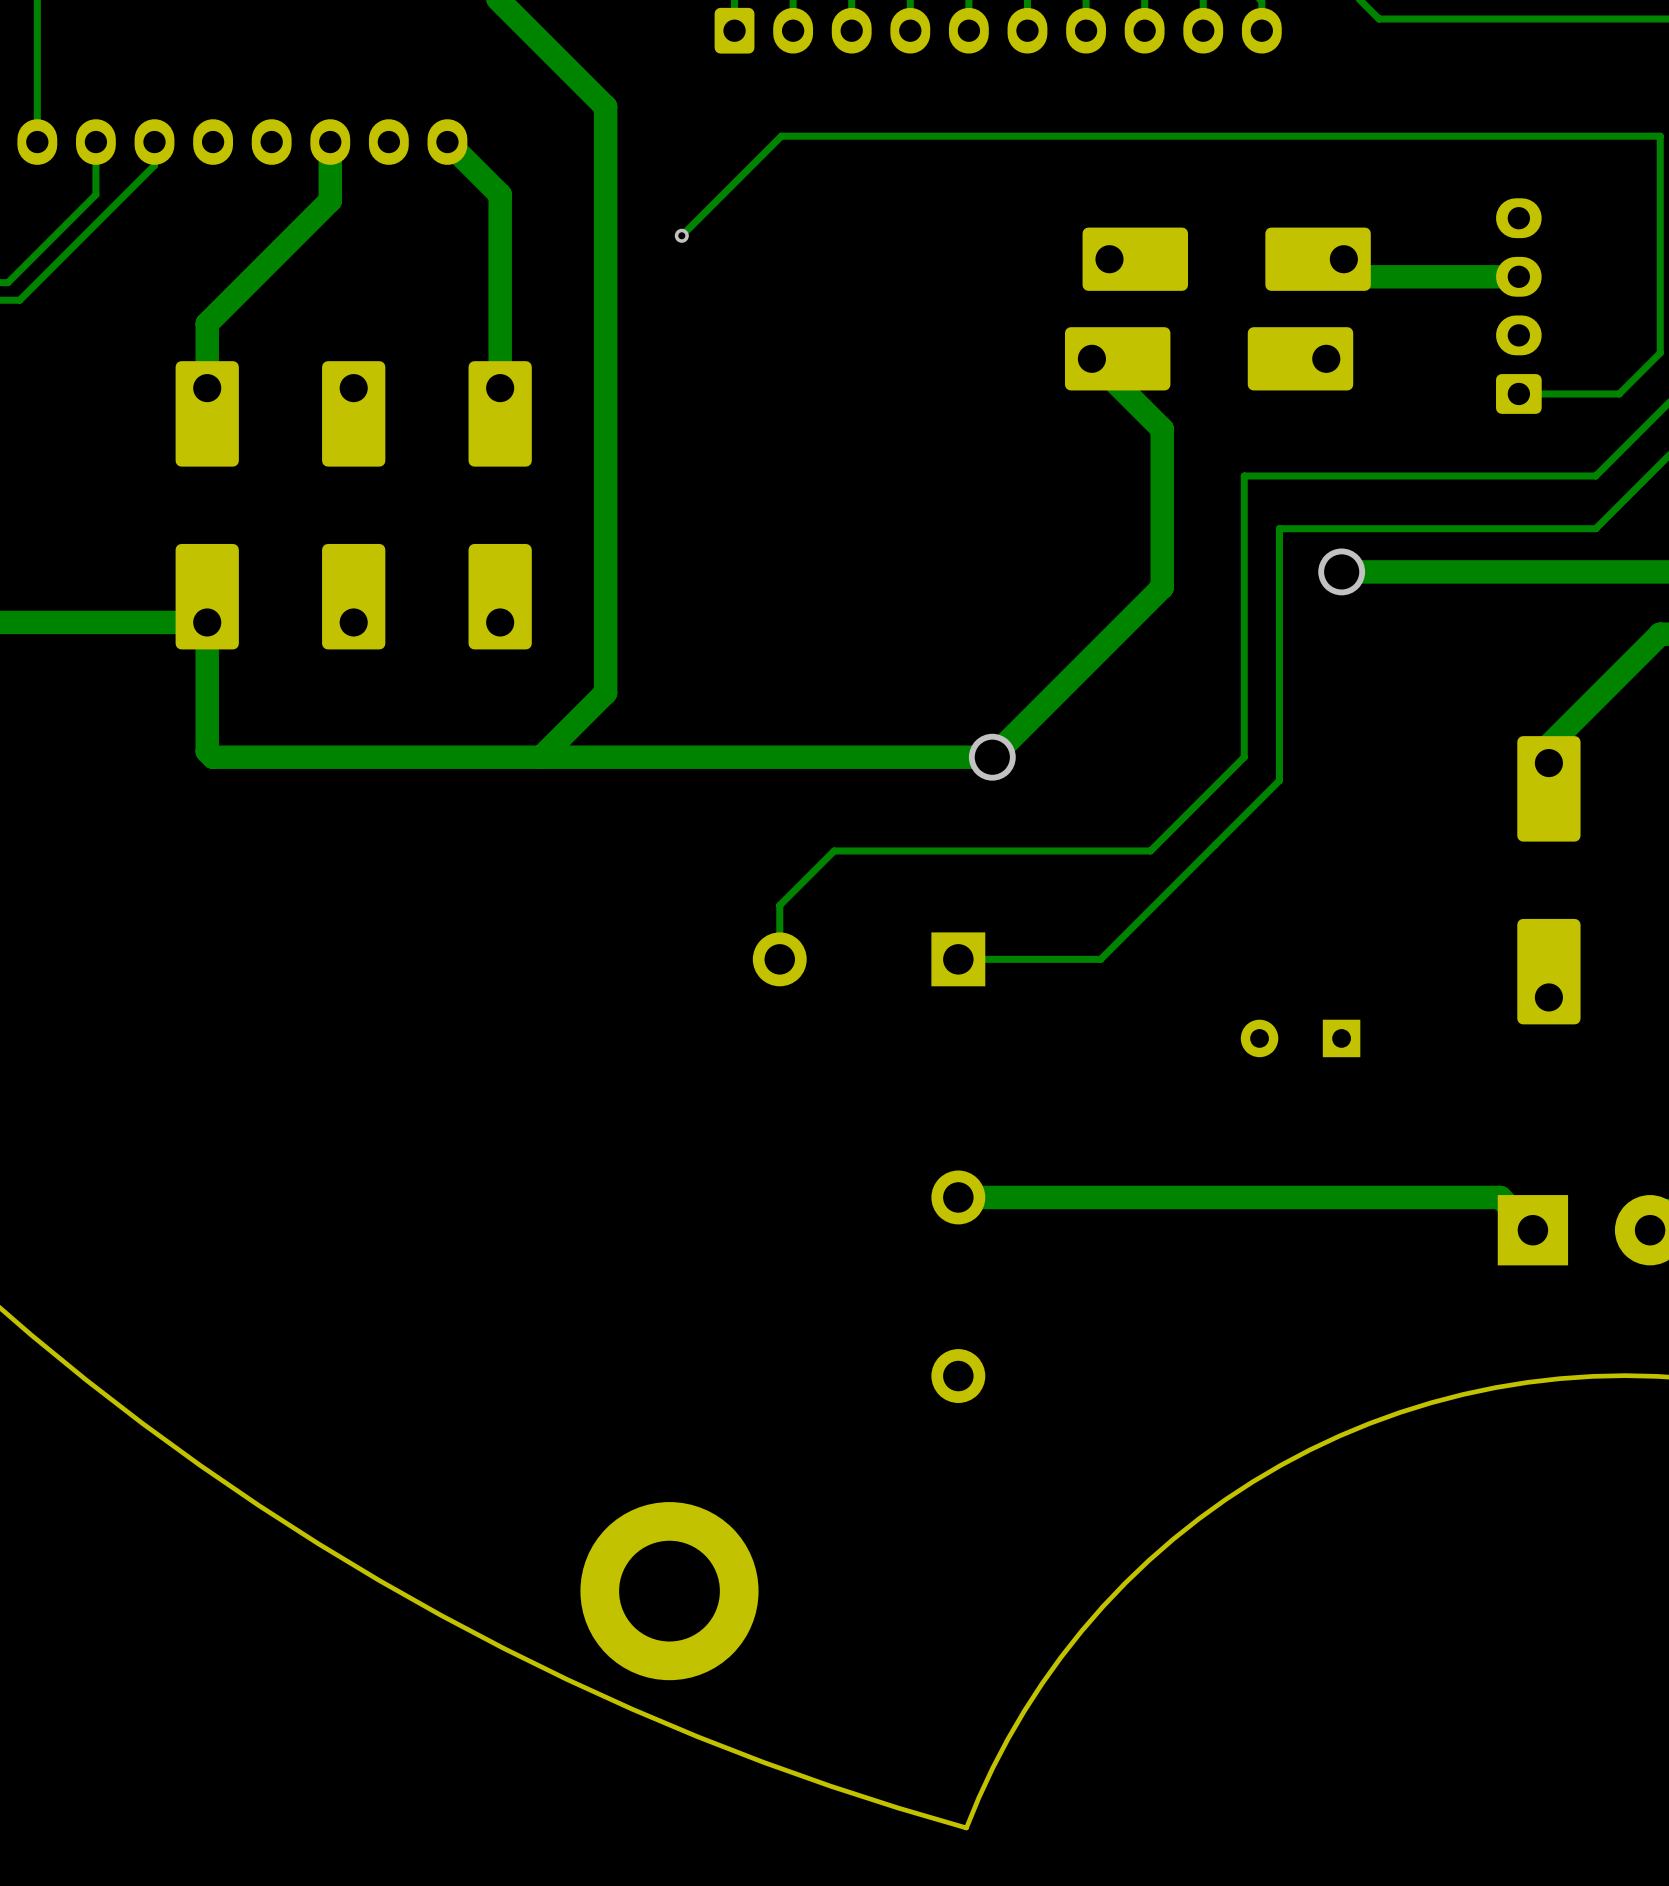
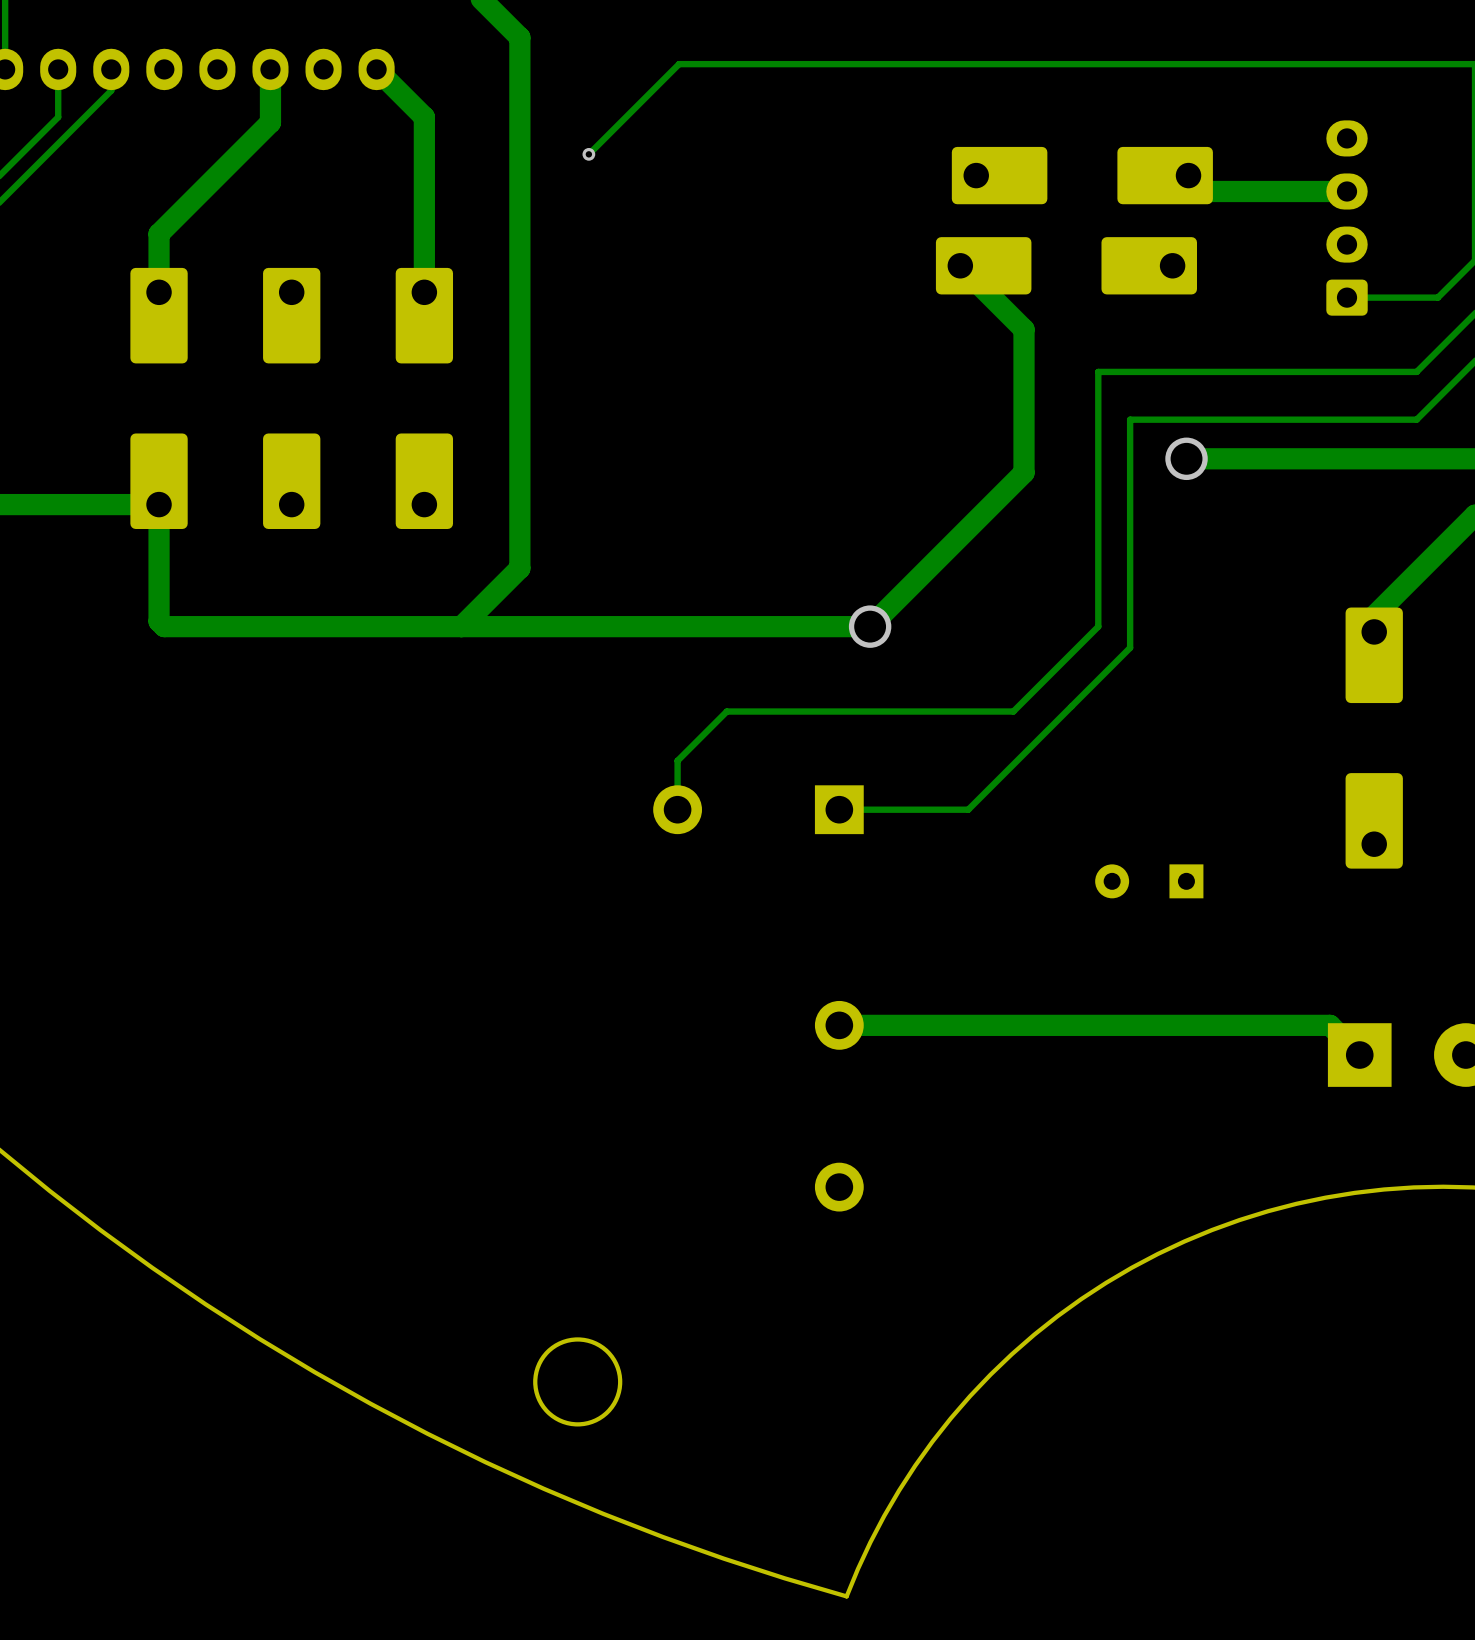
round board edge: none -> [533, 1337, 623, 1427]
part: (669, 1591) -> none

